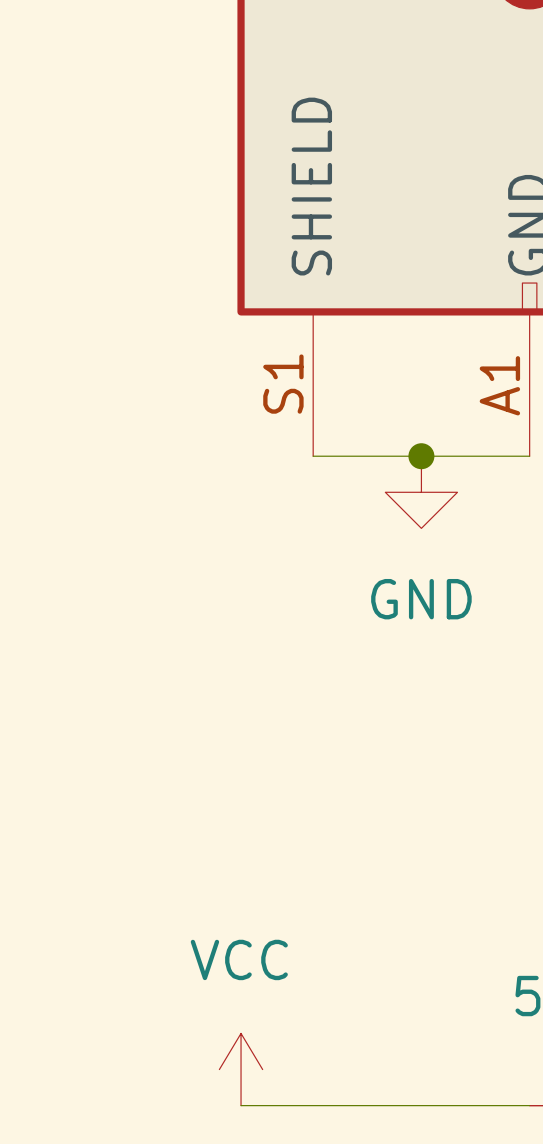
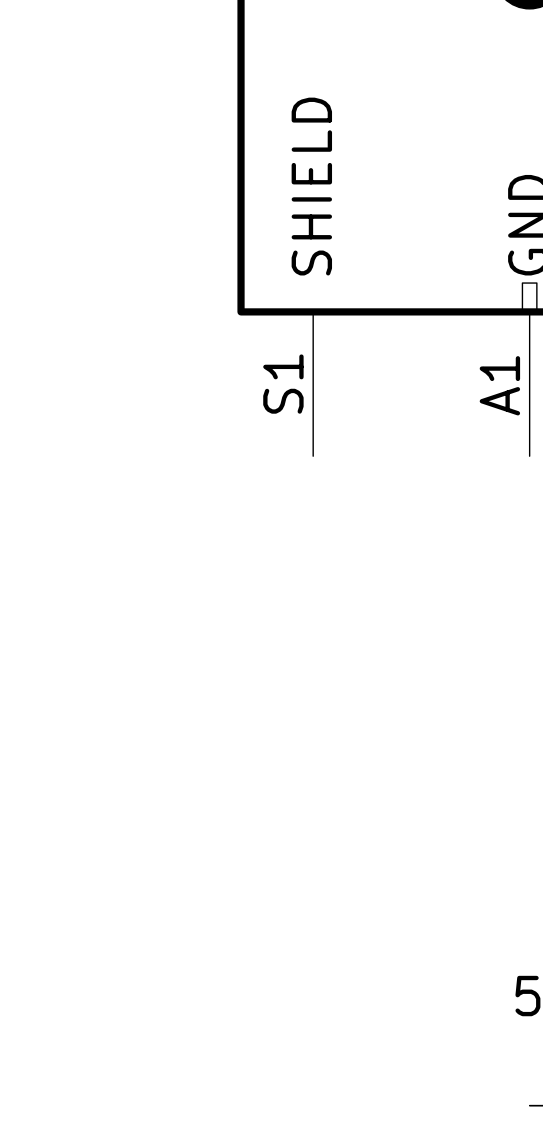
wire: (313, 456) (529, 456) -> none
junction: (421, 456) -> none
power symbol: GND (421, 492) -> none
power symbol: VCC (241, 1069) -> none
wire: (241, 1105) (529, 1105) -> none

